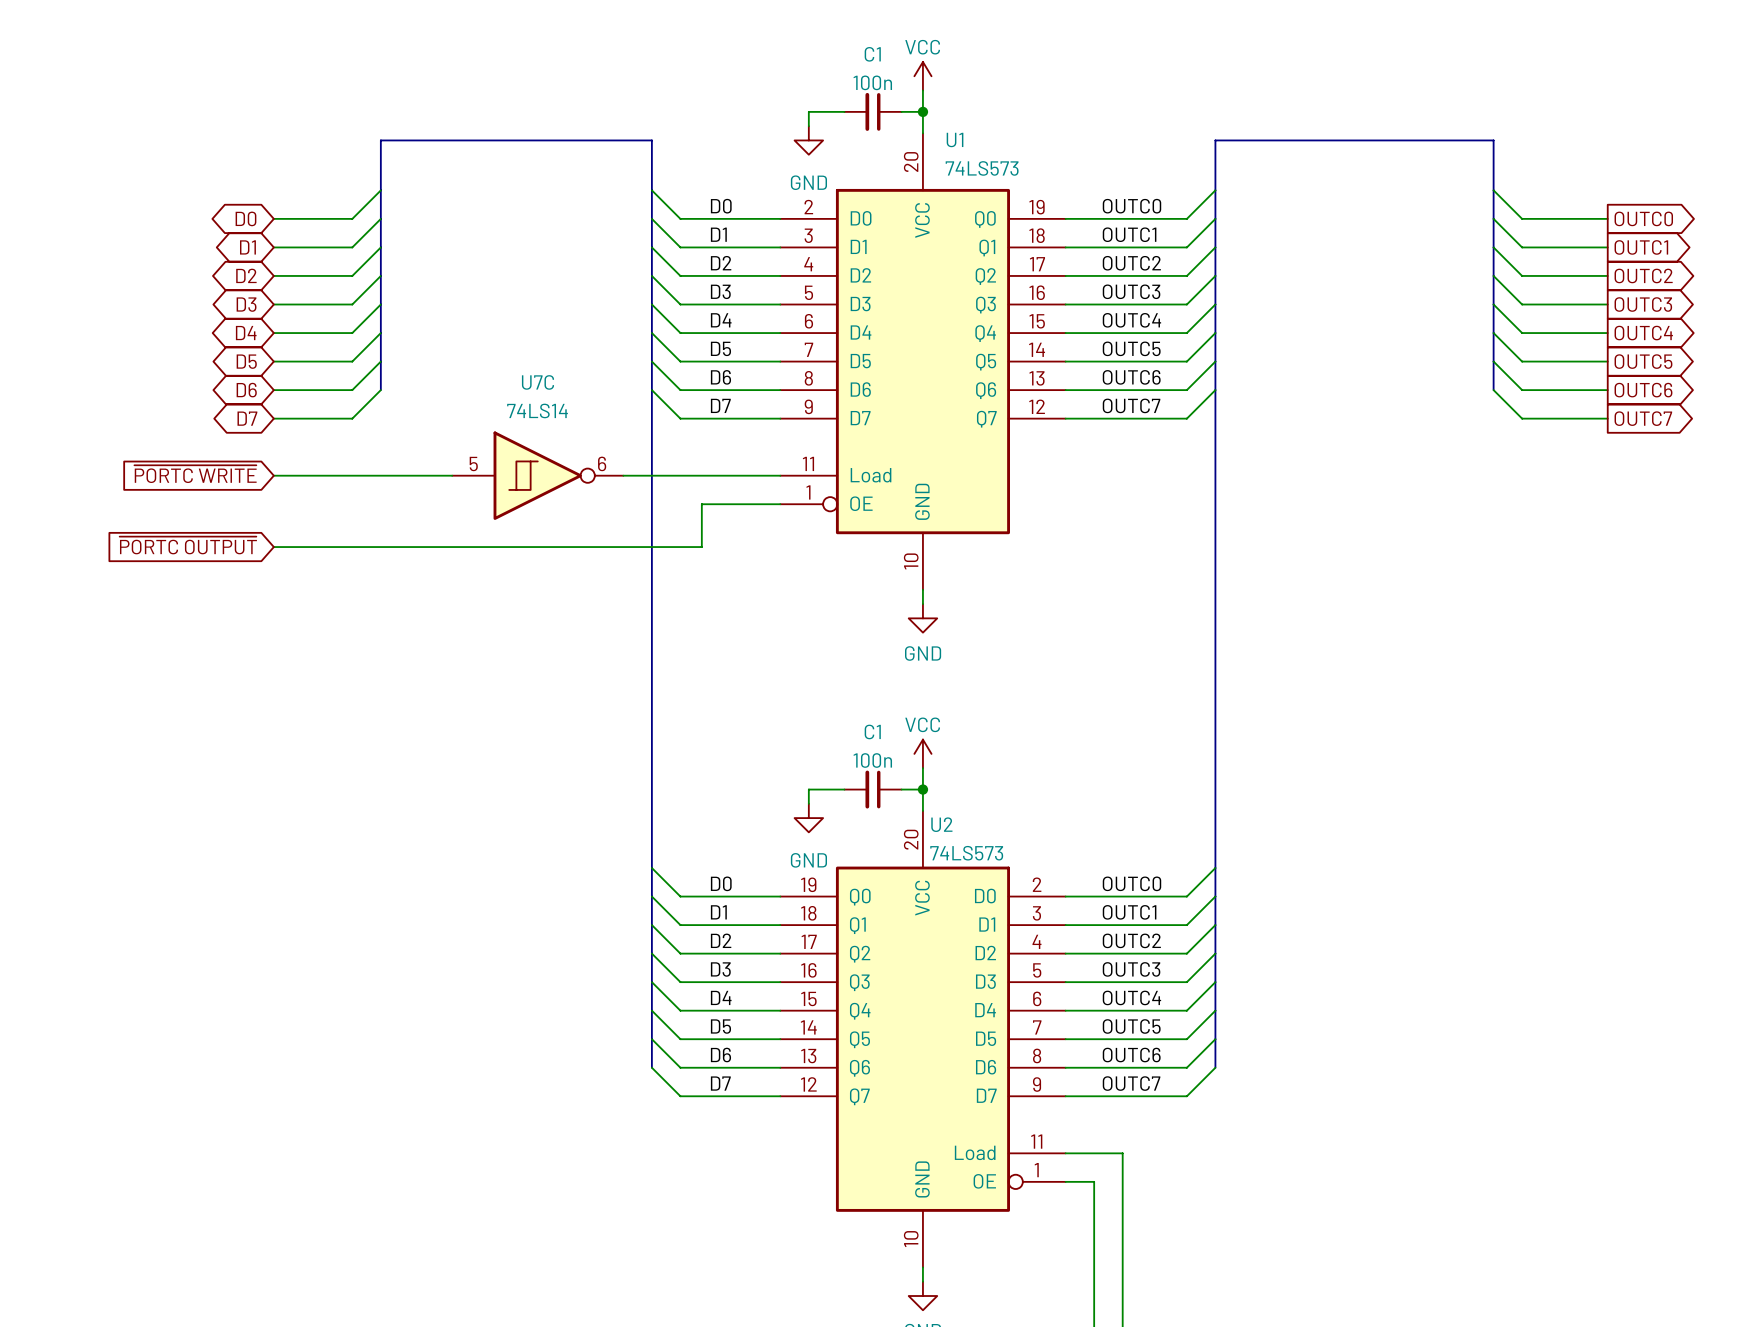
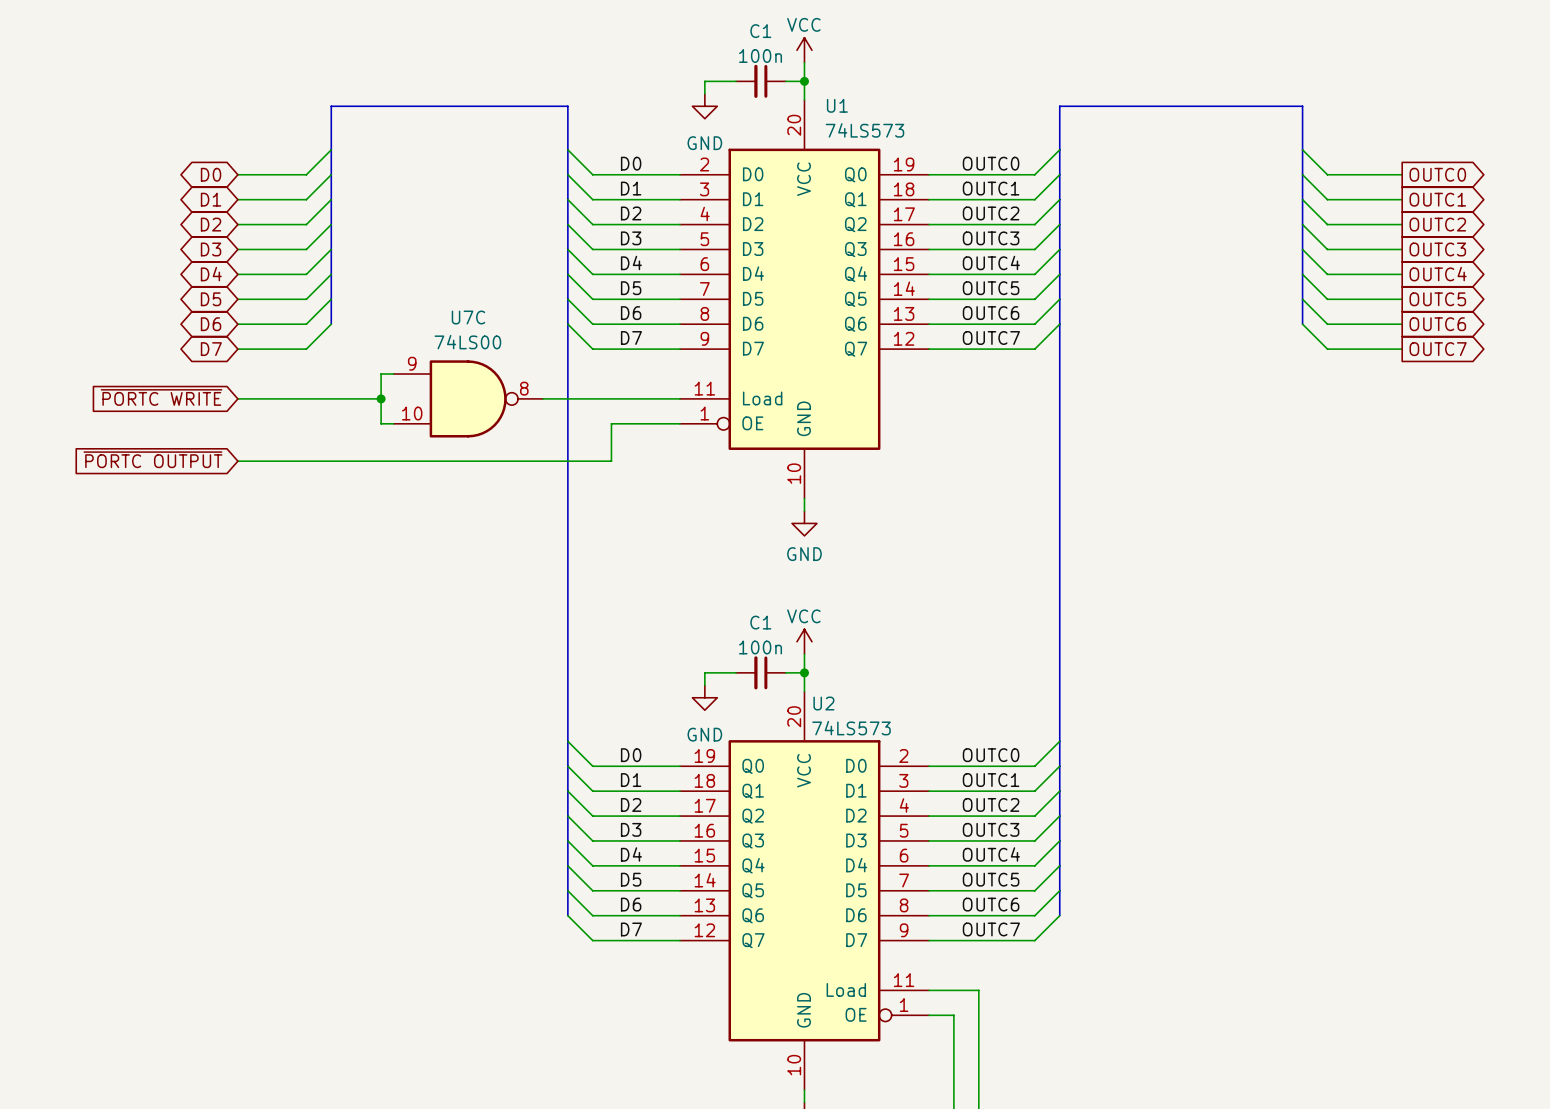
U7C value: 74LS14 (537, 410) -> 74LS00 (467, 342)
U7C symbol: [452, 431, 624, 520] -> [393, 360, 543, 438]
wire: none -> (393, 374) (381, 374) (381, 423) (393, 423)
wire: (437, 475) (452, 475) -> none
junction: none -> (381, 398)

